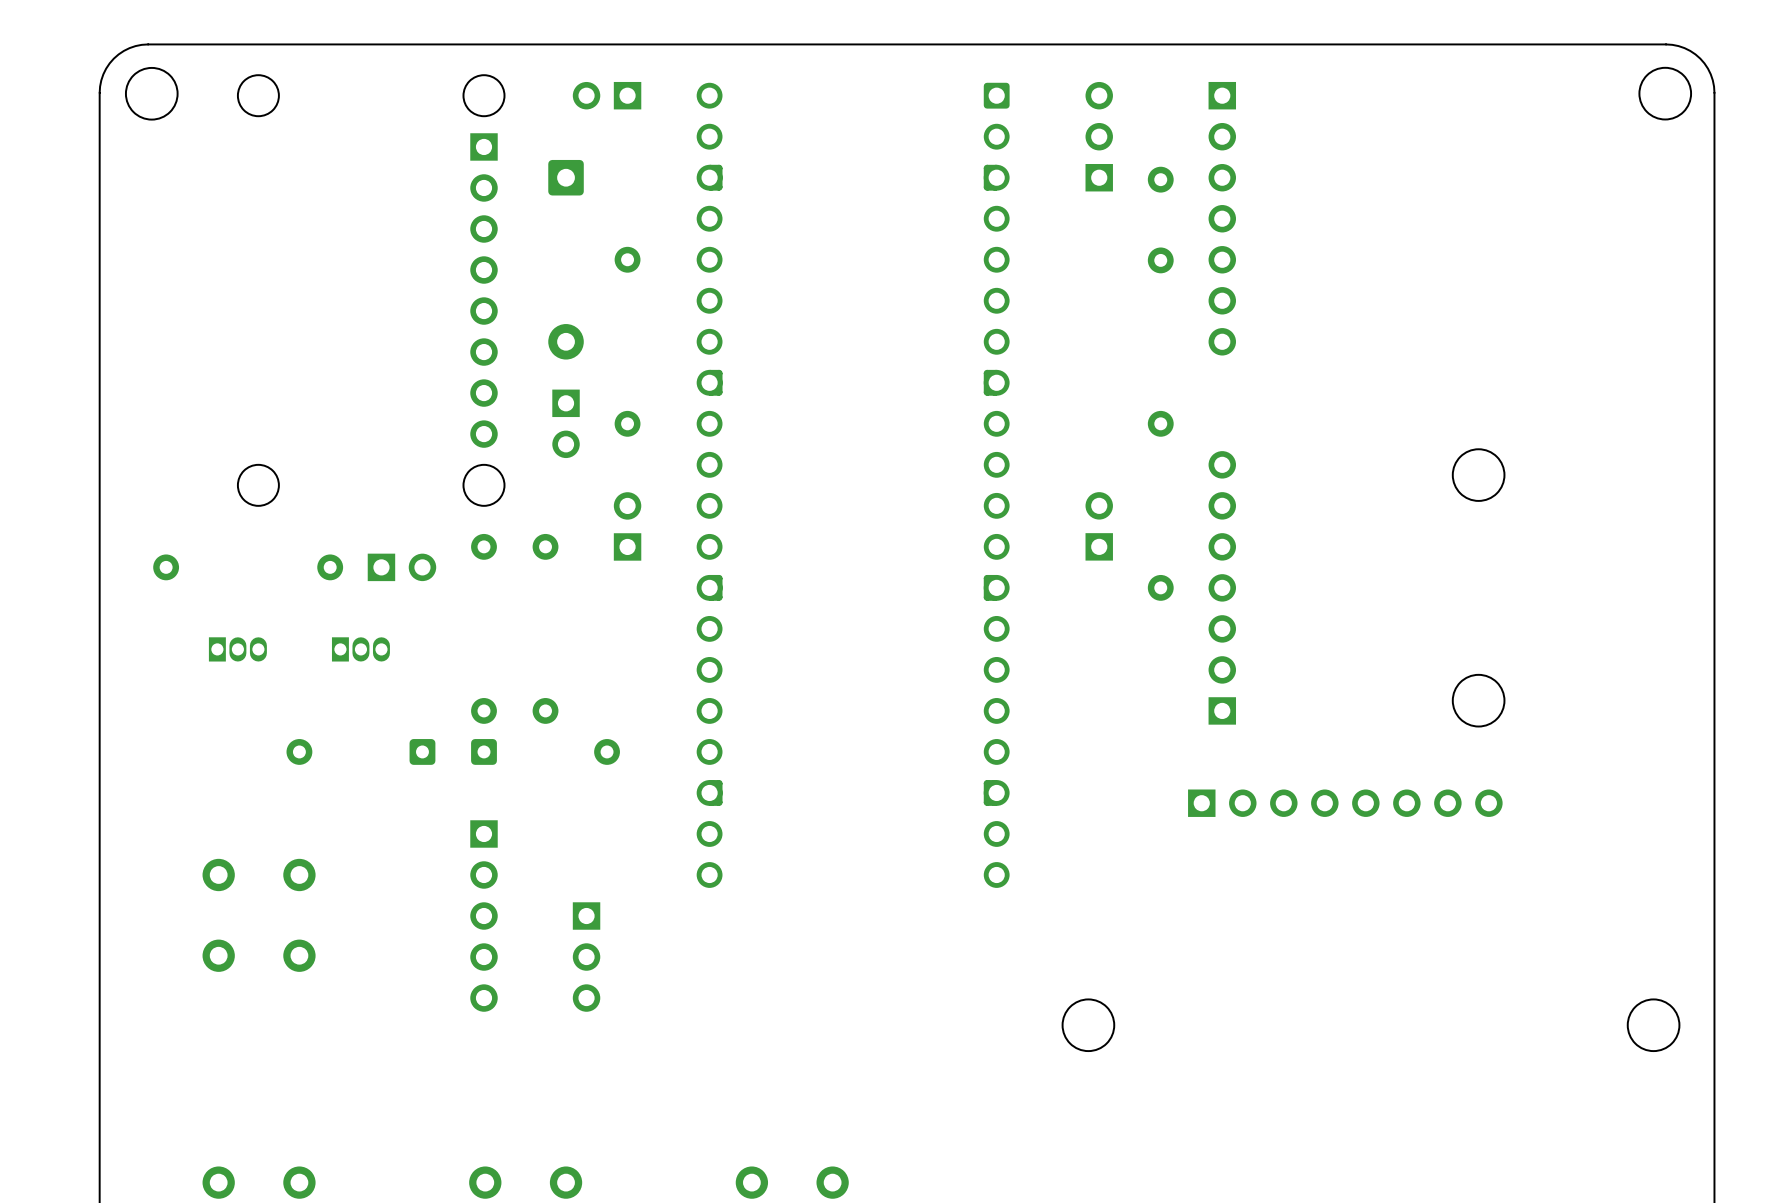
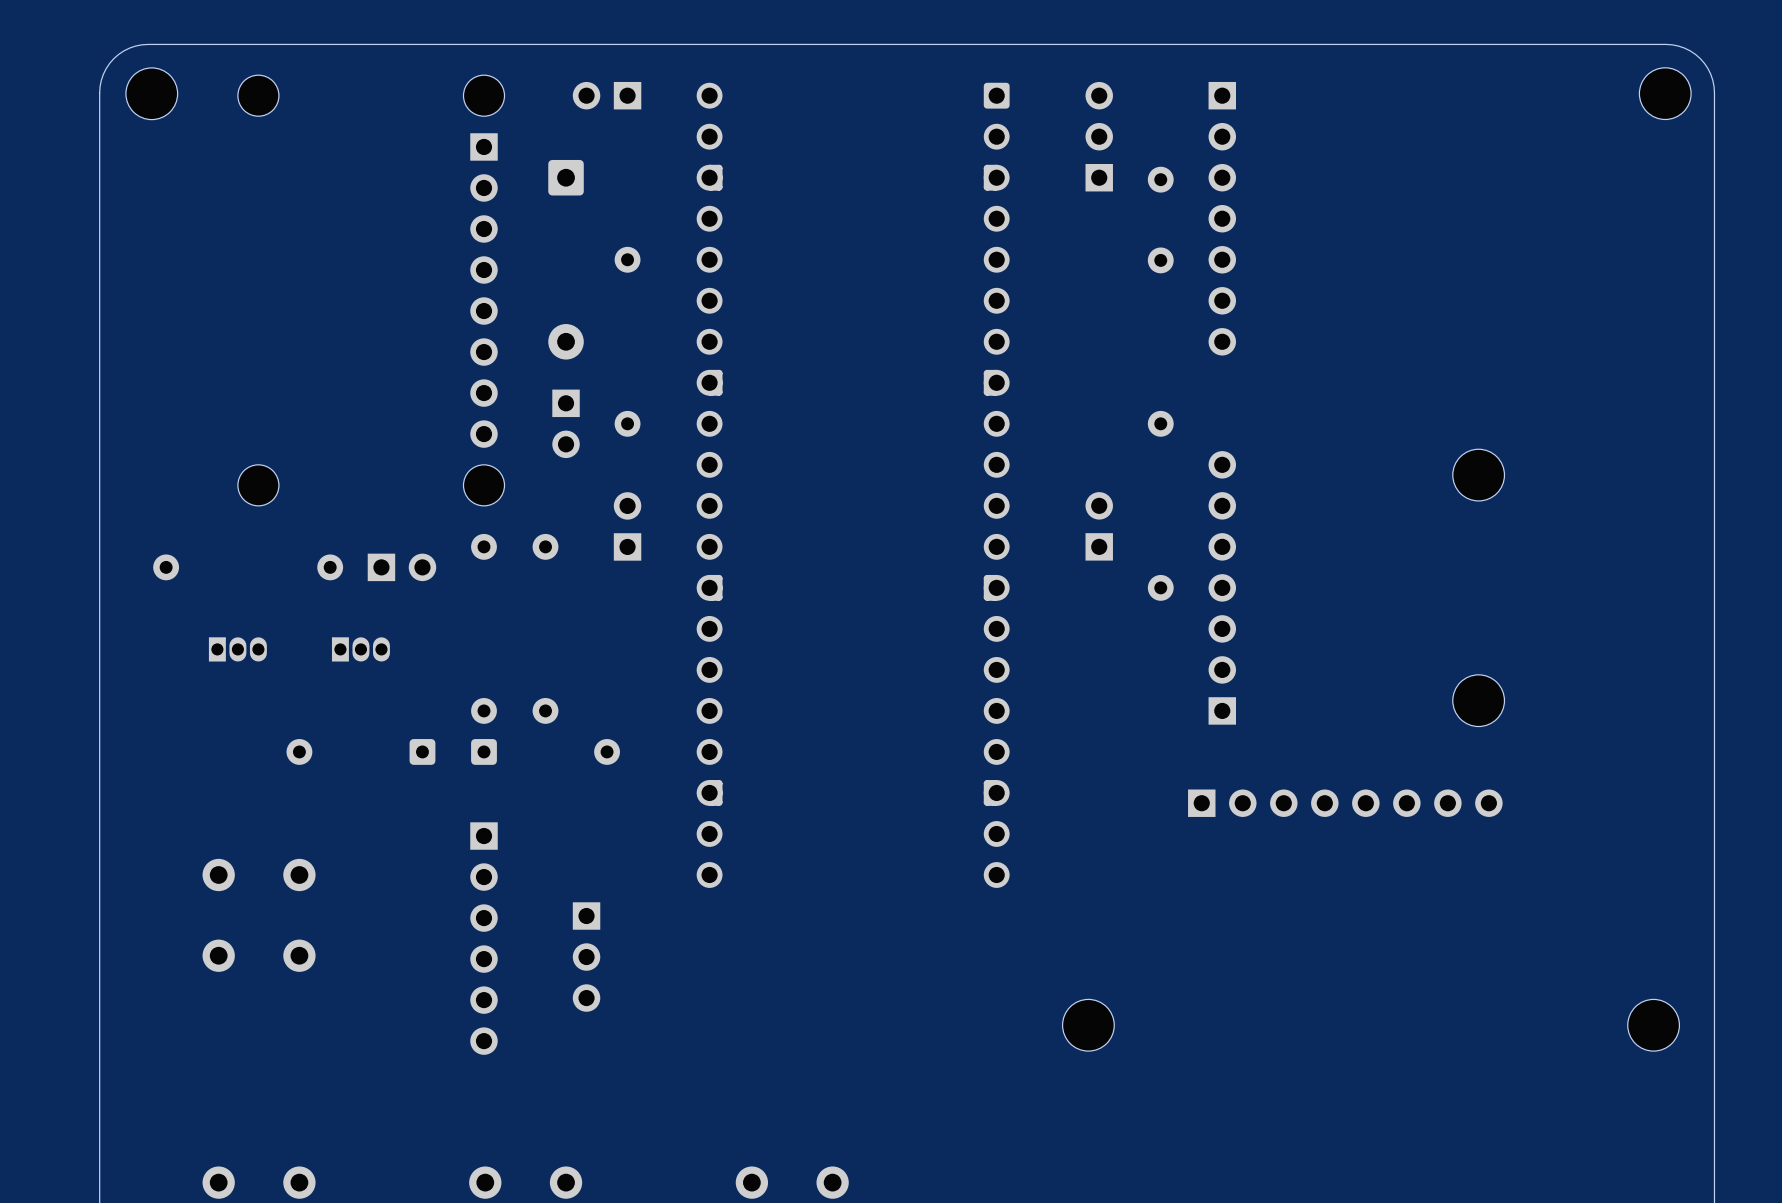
part: (483, 916) -> none
part: none -> (483, 938)

